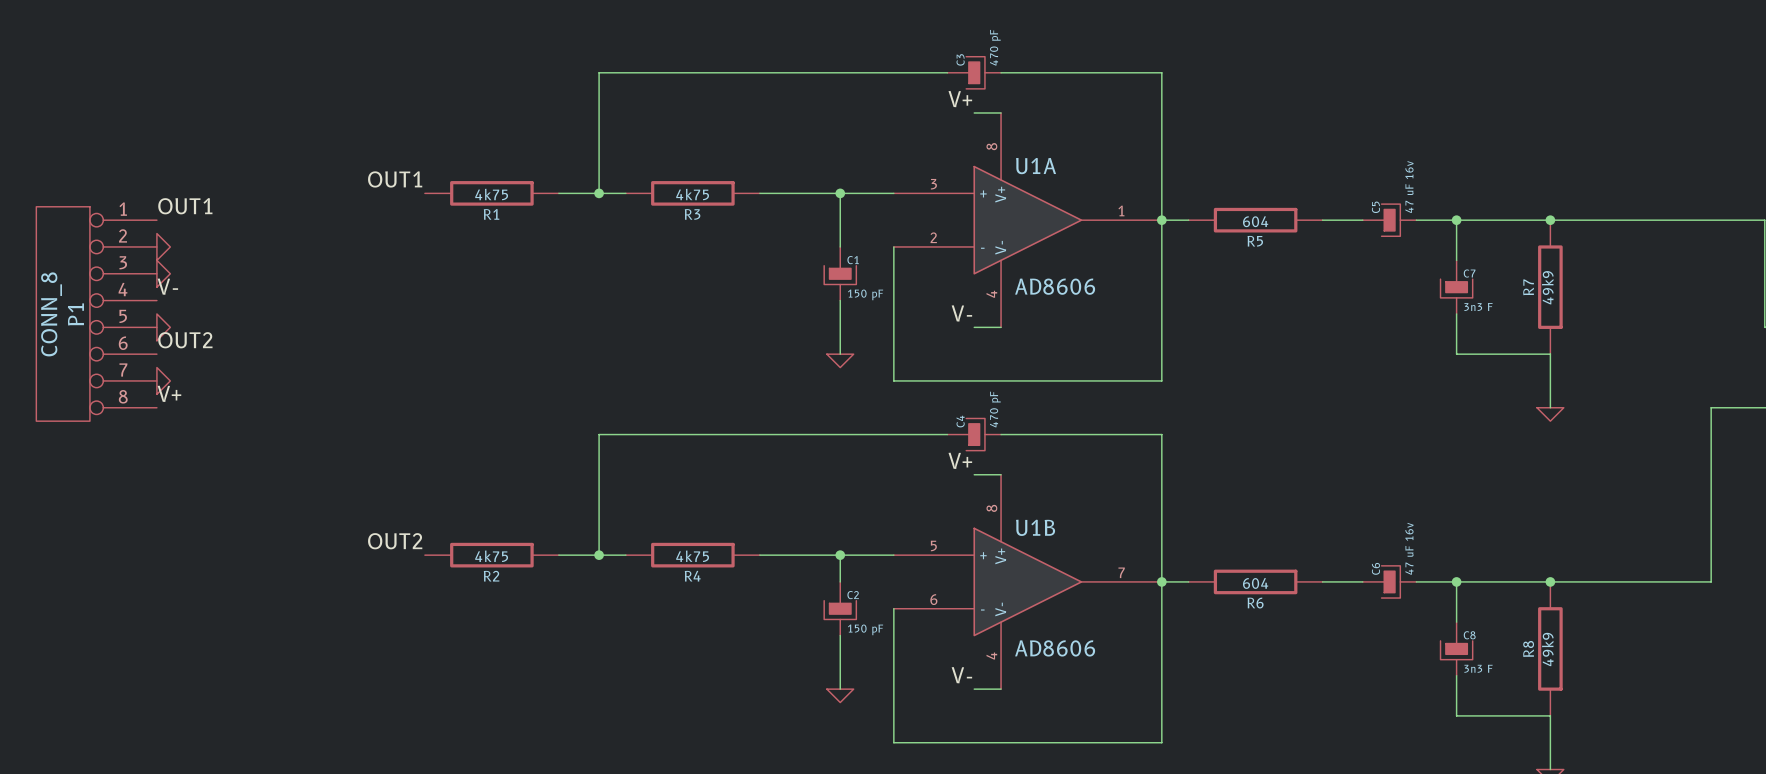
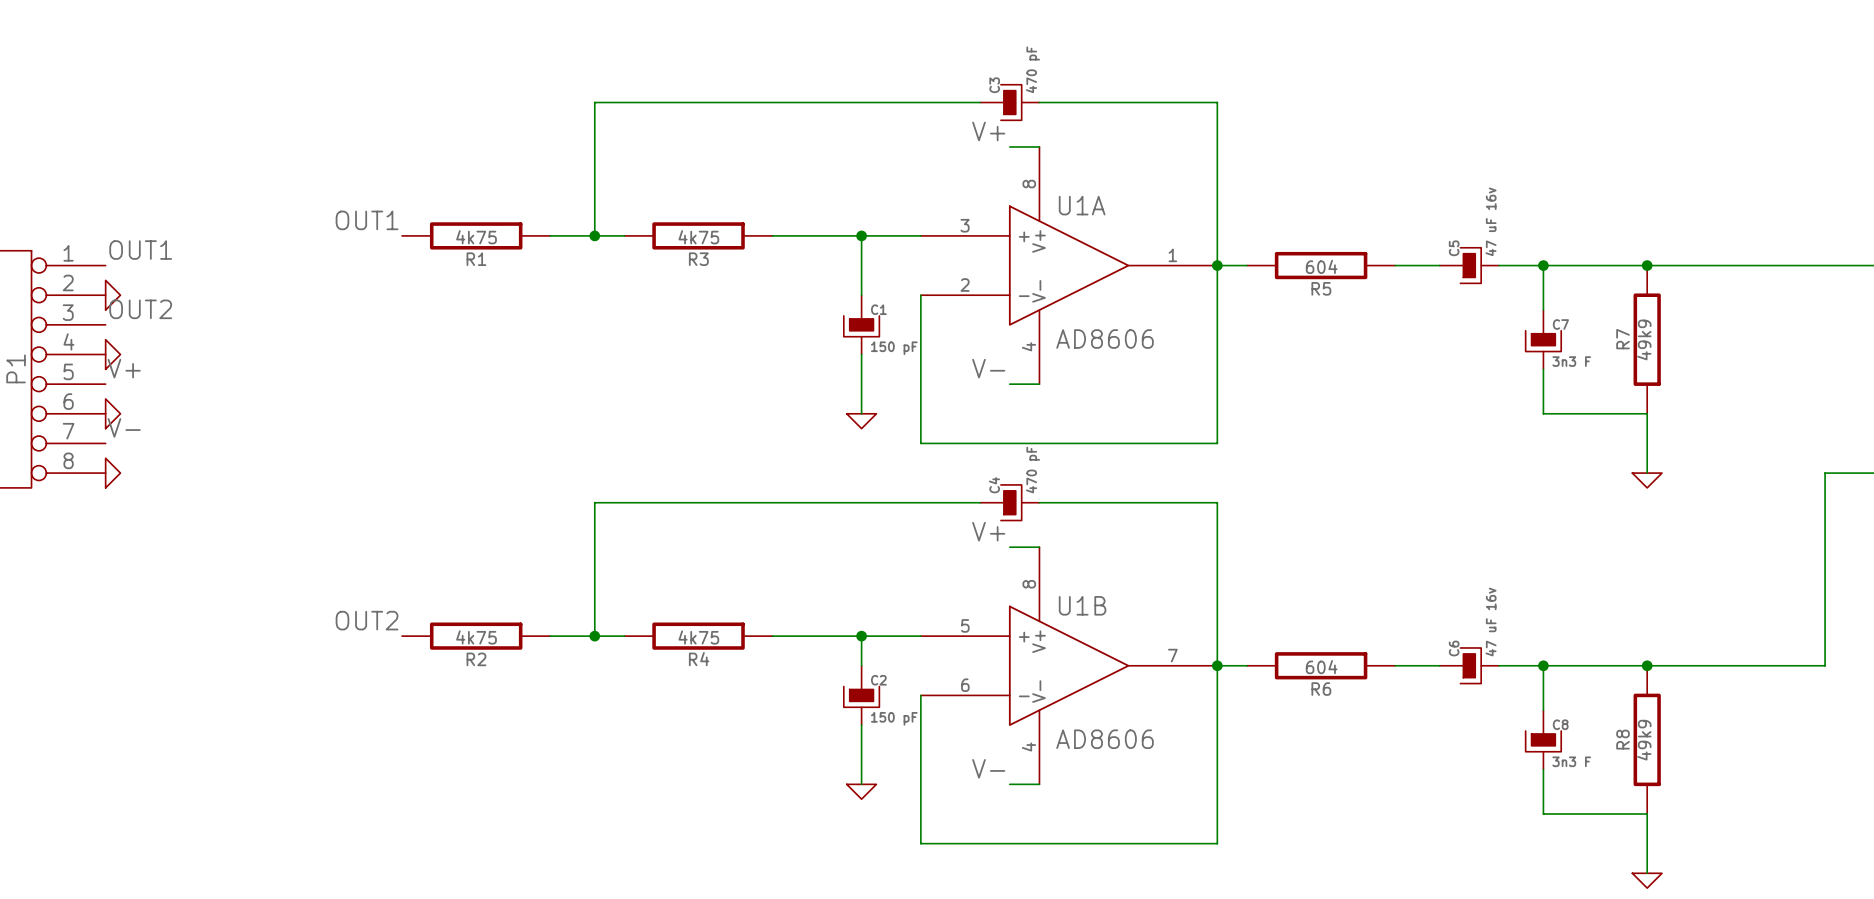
power symbol: (163, 273) -> none
label position: V- (167, 286) -> V- (124, 427)
power symbol: none -> (113, 354)
power symbol: (163, 327) -> none
label position: OUT2 (185, 340) -> OUT2 (140, 309)
power symbol: none -> (113, 413)
power symbol: (163, 380) -> none
label position: V+ (169, 393) -> V+ (124, 368)
power symbol: none -> (113, 473)

